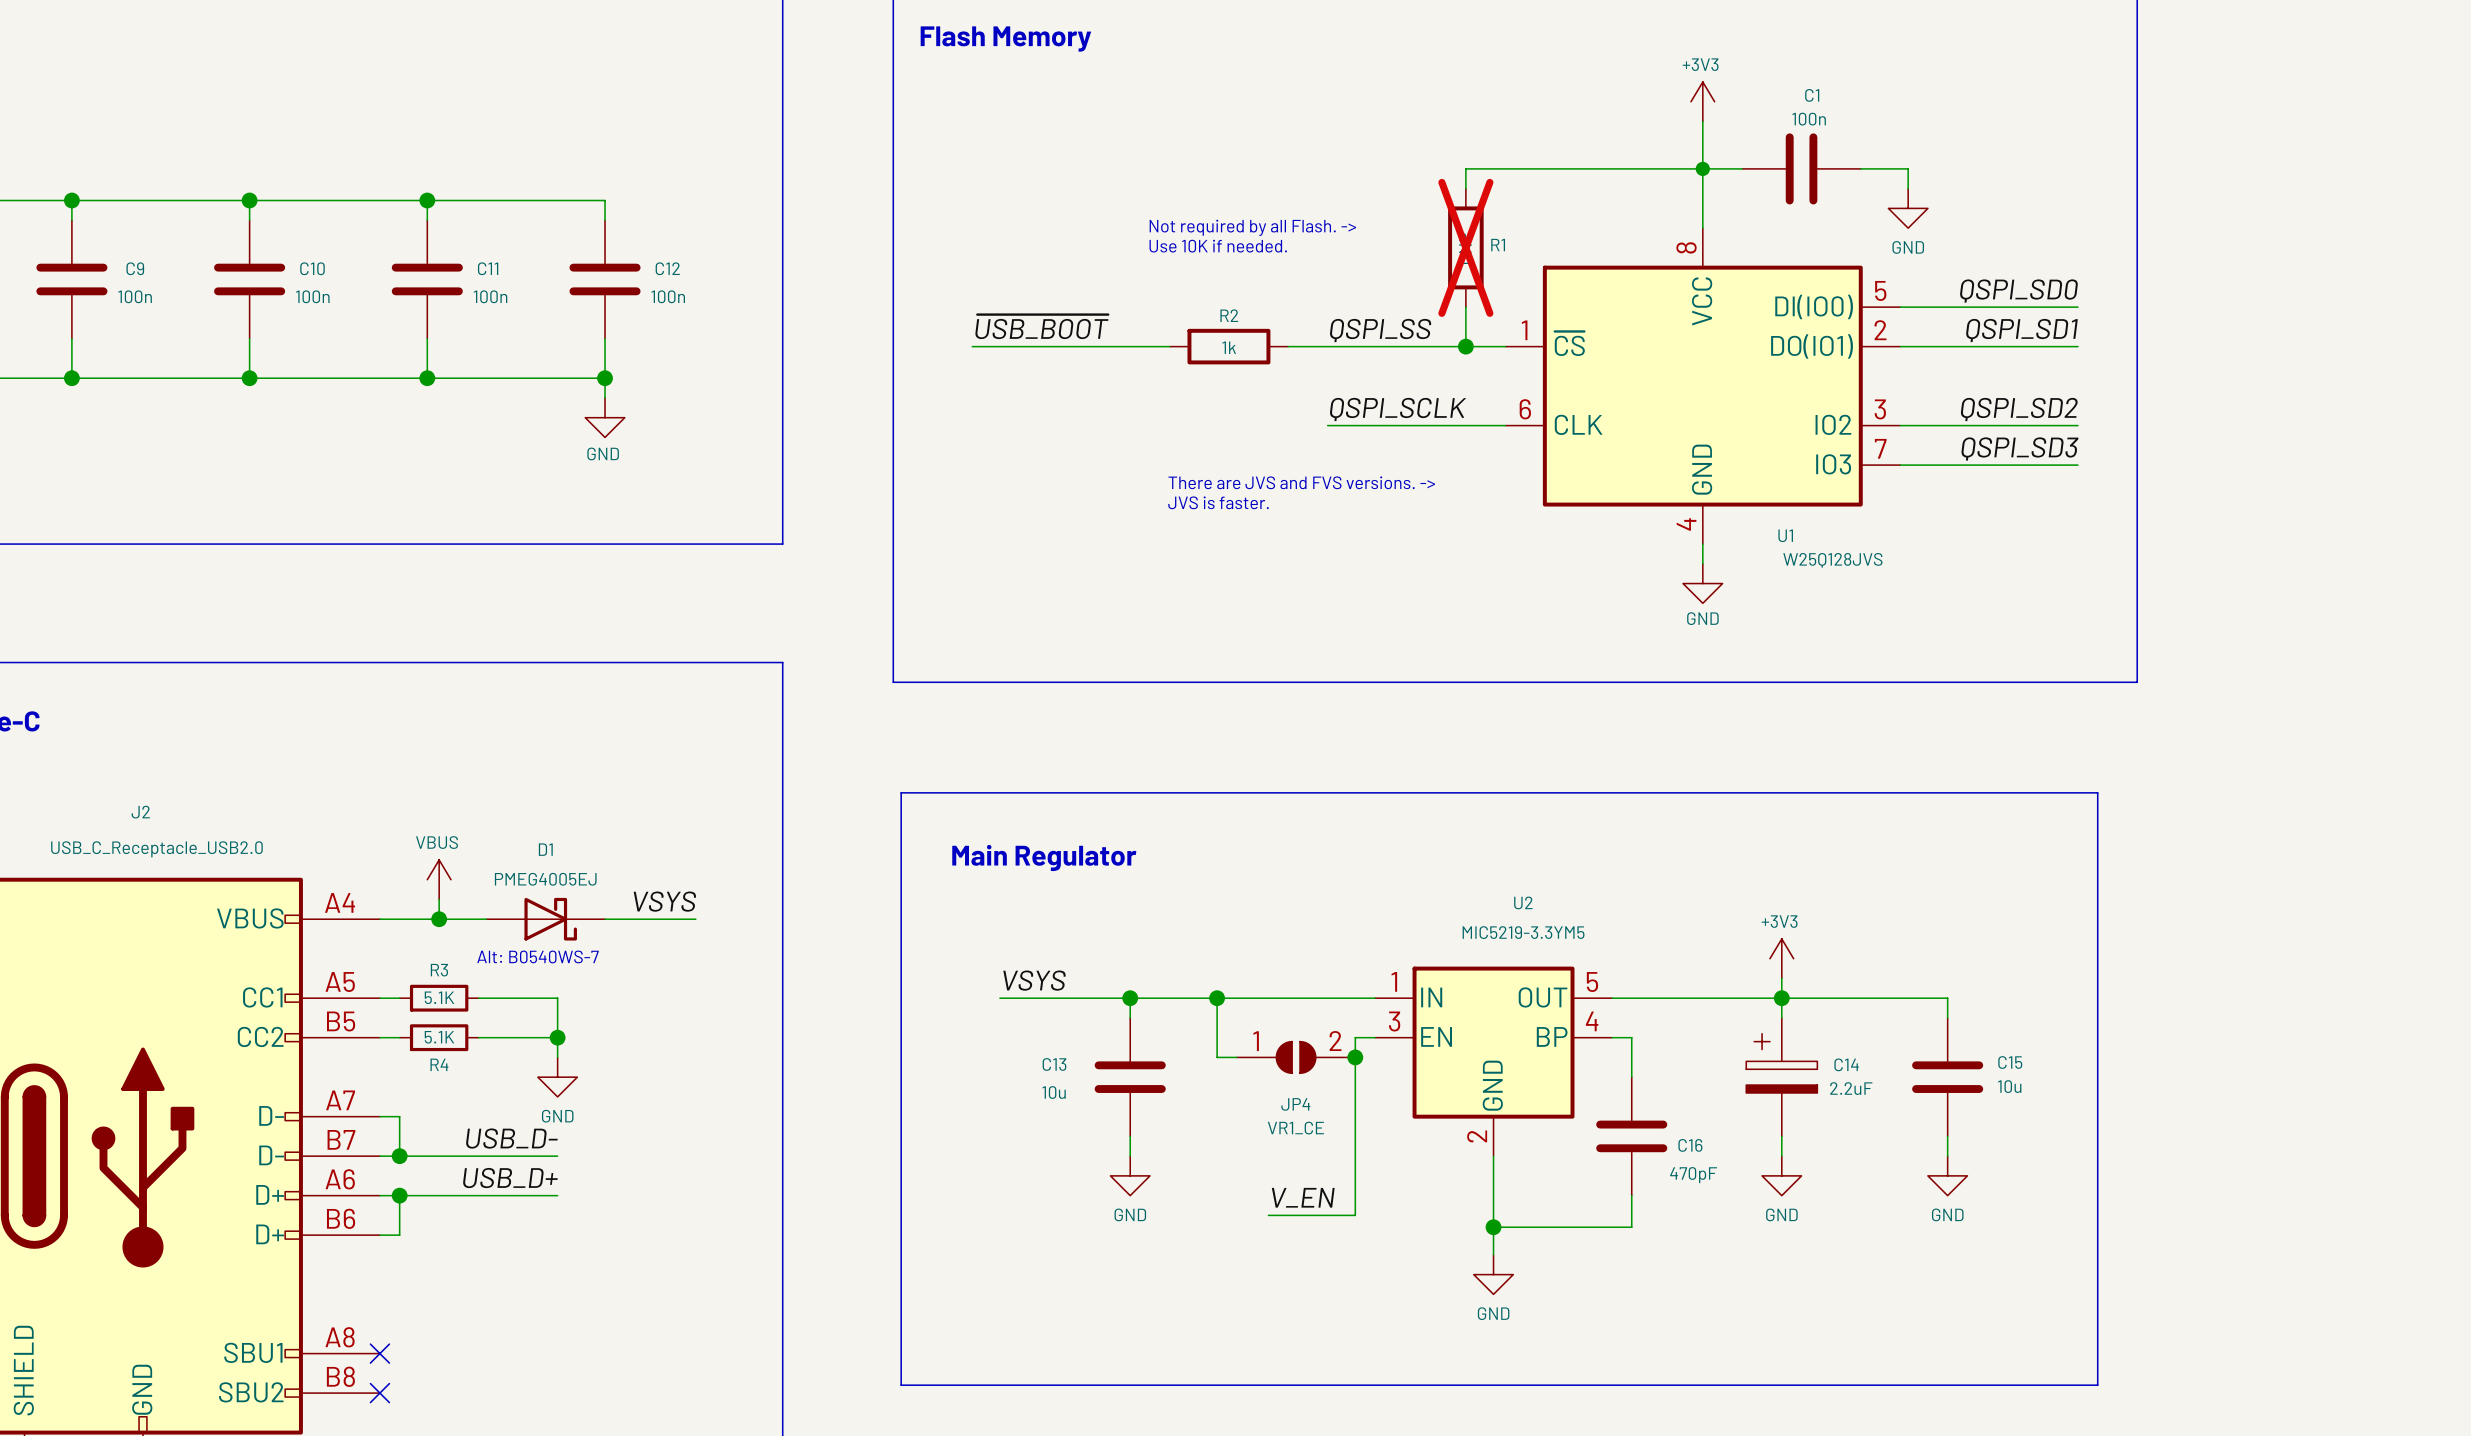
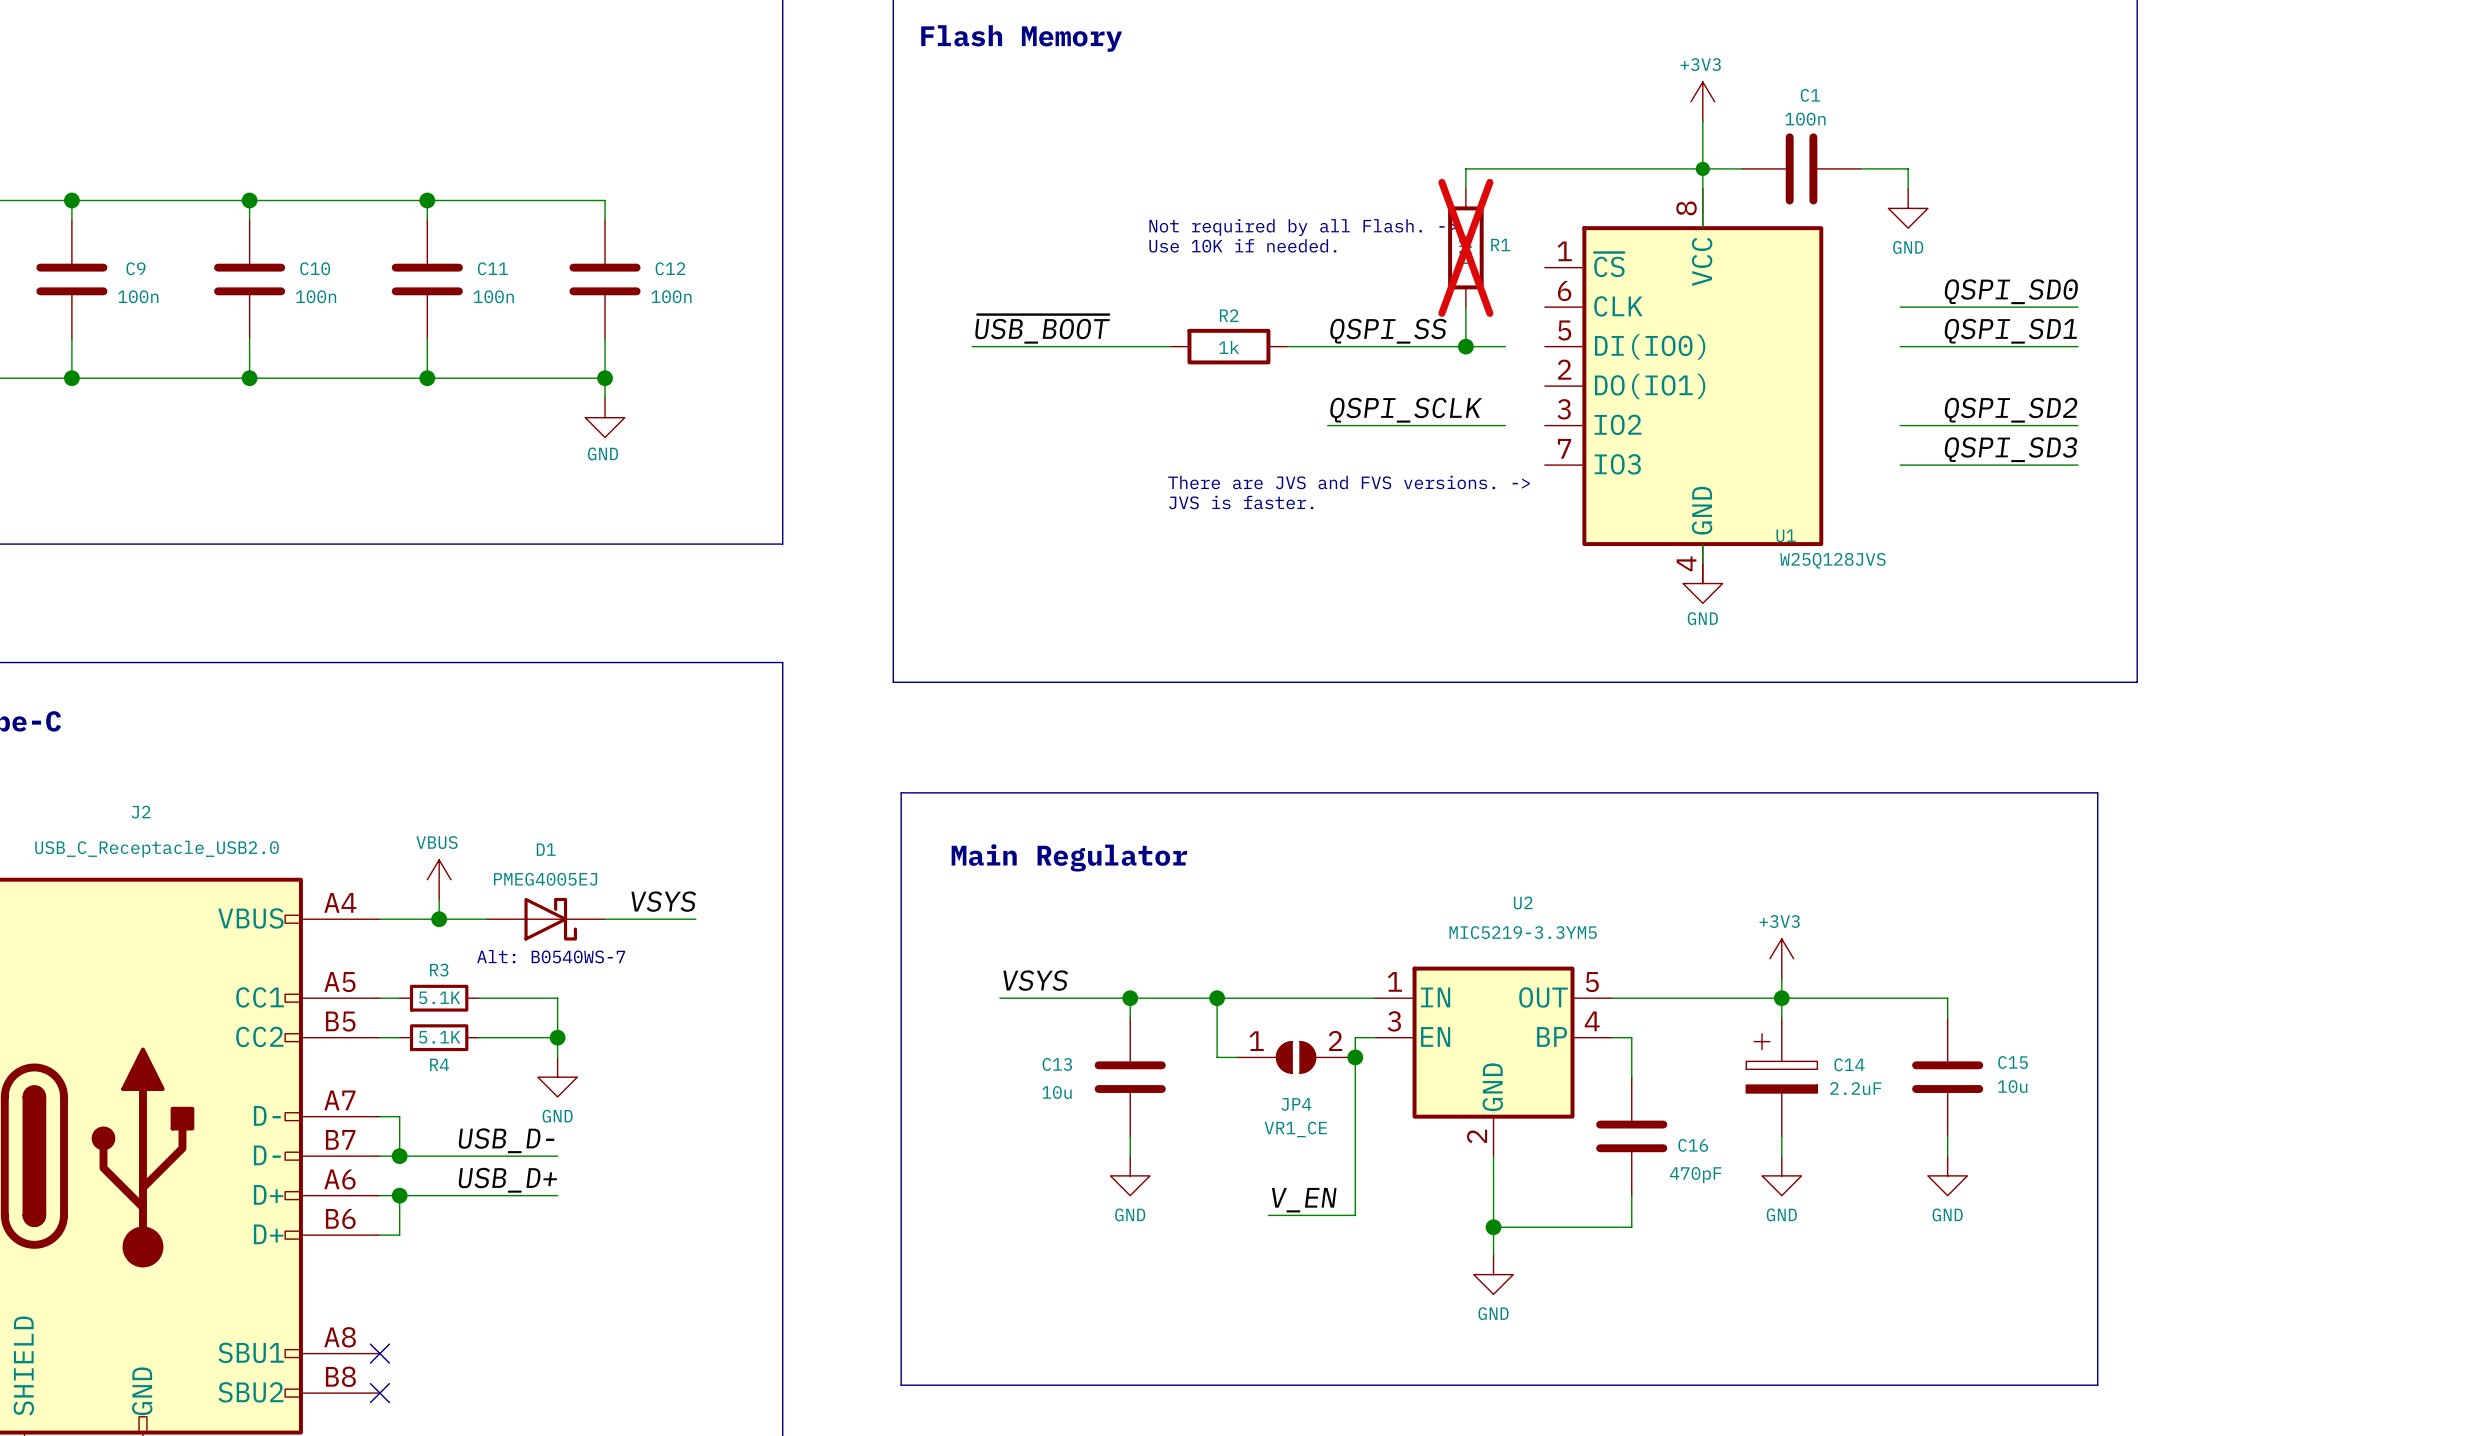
U1 symbol: [1505, 228, 1901, 545] -> [1544, 188, 1824, 584]

